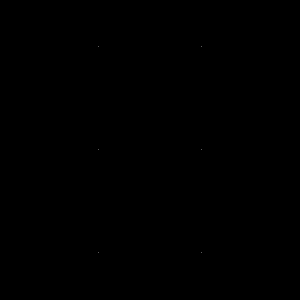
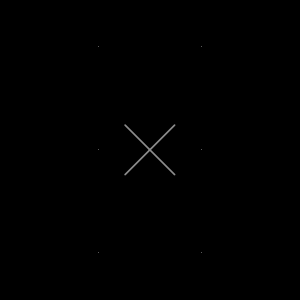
no-connect mark: none -> (149, 149)

